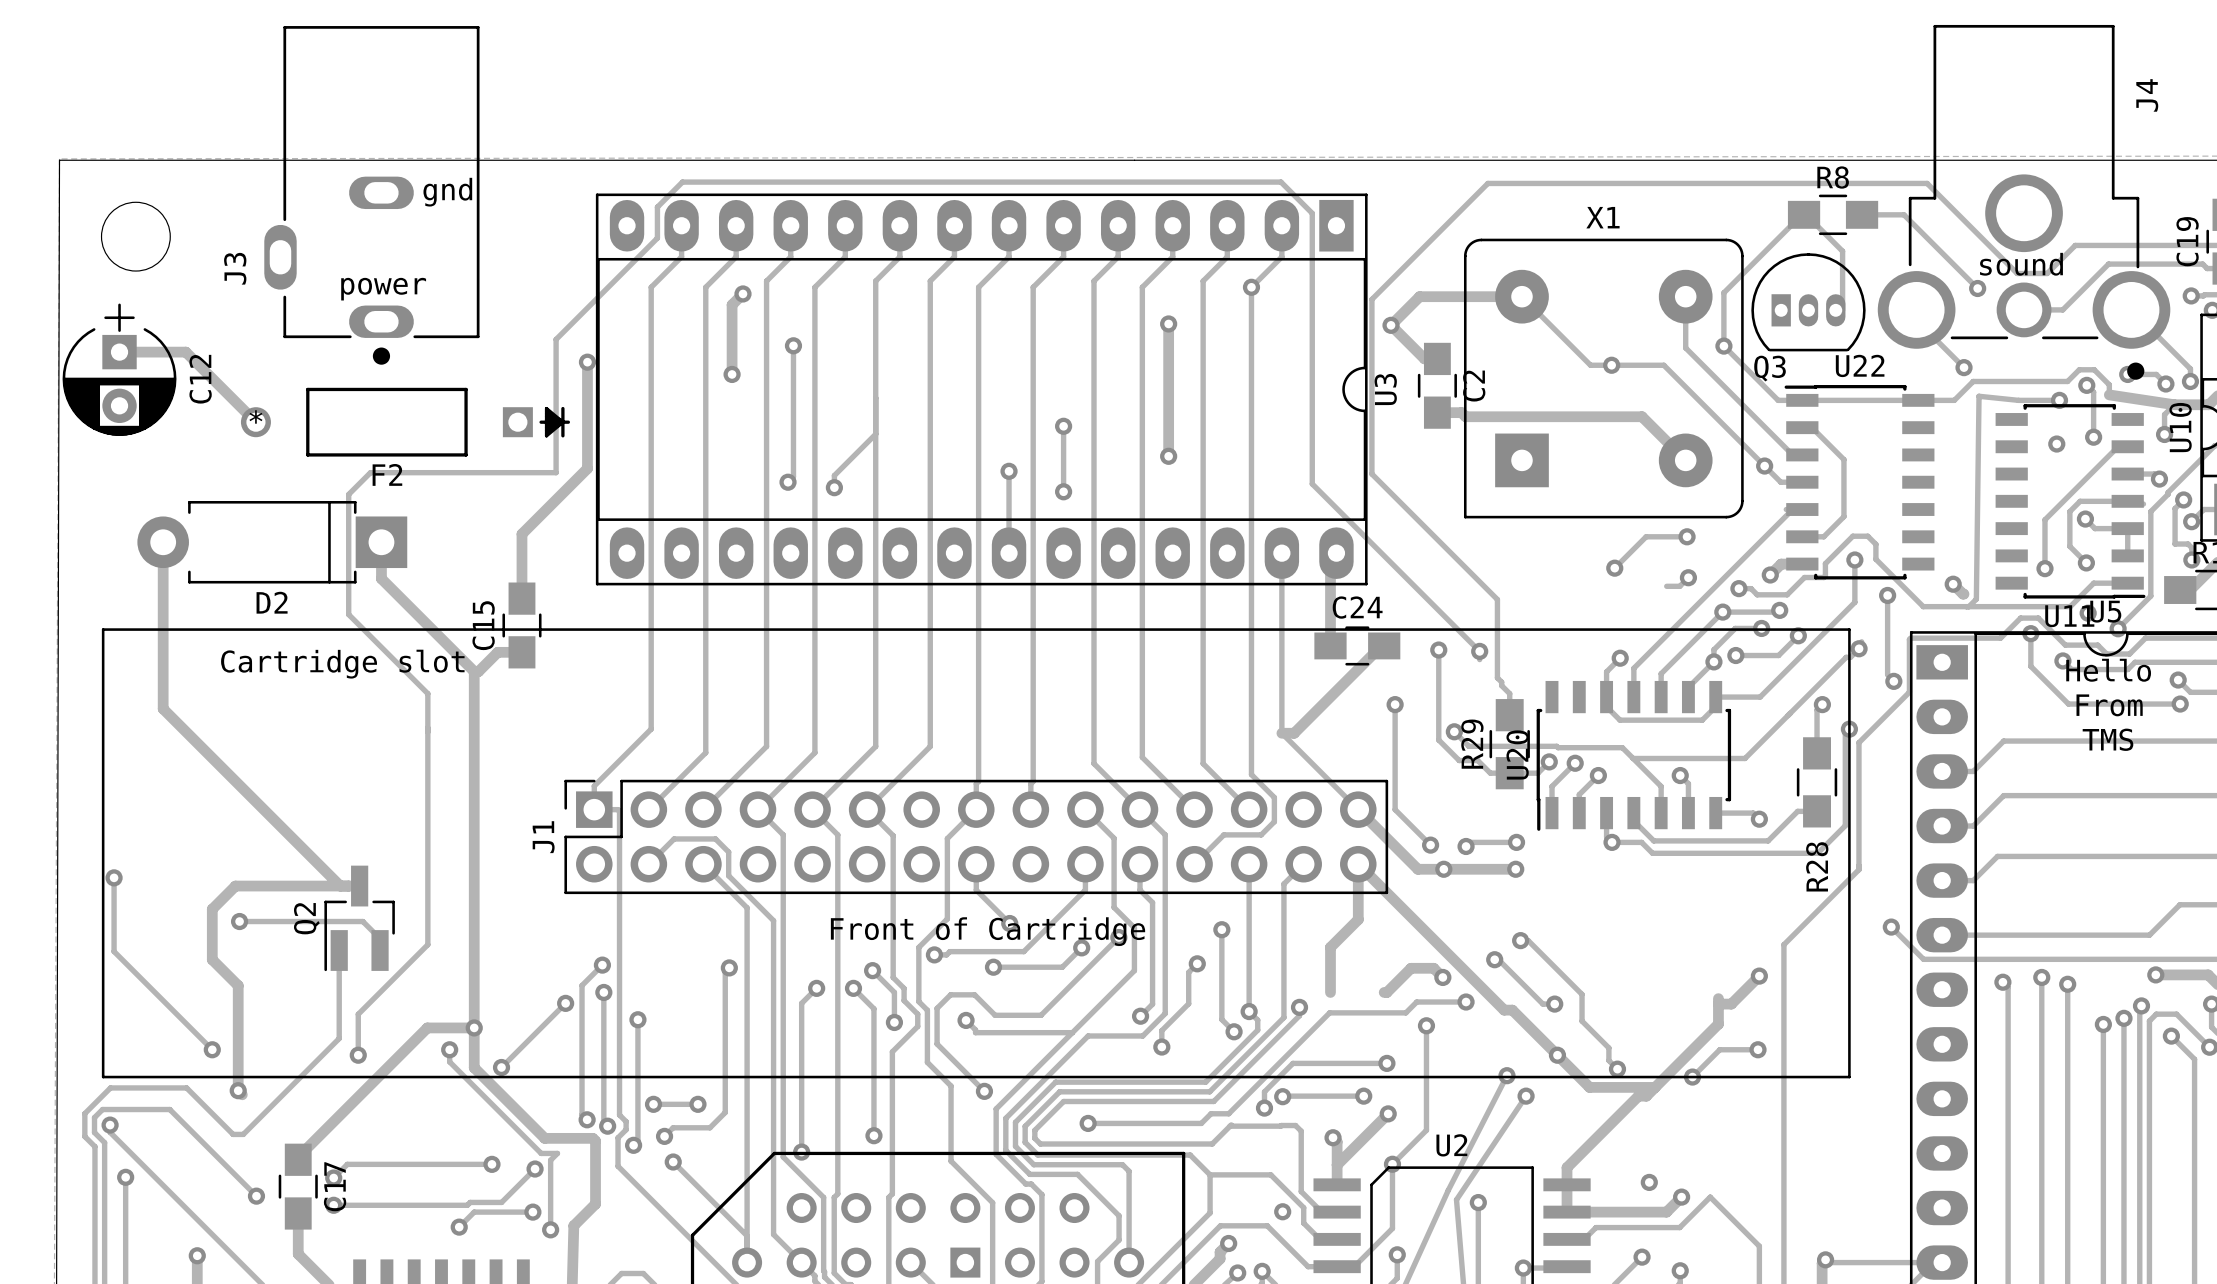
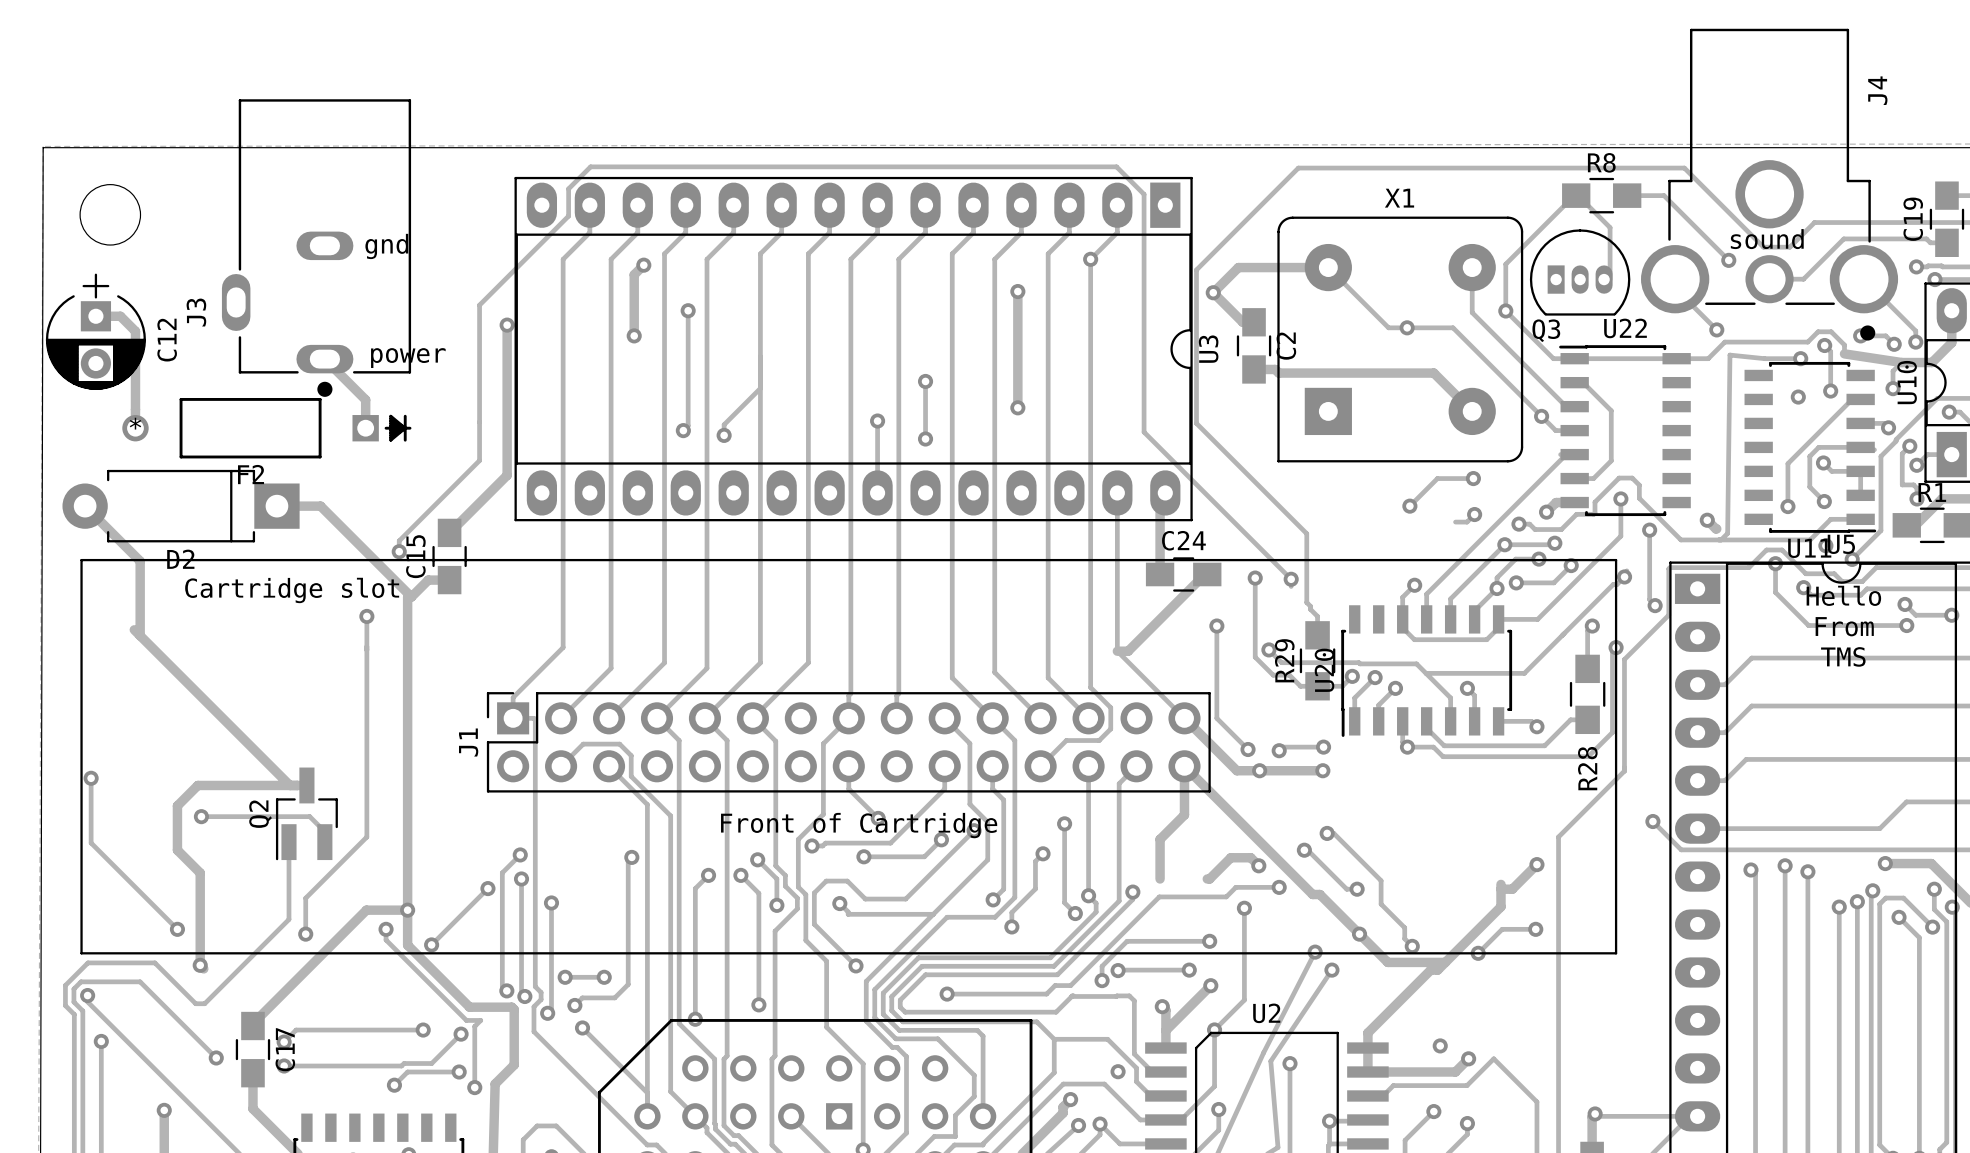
text position: gnd (447, 192) -> gnd (386, 246)
J3 position: (371, 195) -> (316, 248)
text position: power (383, 289) -> power (408, 358)
track: (147, 352) (185, 352) (255, 422) -> (120, 316) (135, 331) (135, 428)
track: none -> (324, 359) (365, 399) (365, 428)
F2 position: (405, 422) -> (266, 428)
track: (587, 468) (521, 534) (521, 598) -> (507, 418) (507, 475) (449, 532)
track: (556, 472) (370, 472) (348, 494) (348, 614) (427, 693) -> (479, 422) (479, 460) (399, 540) (399, 551)
track: (163, 542) (163, 708) -> none
D2 position: (272, 542) -> (181, 506)
track: (381, 542) (381, 578) (474, 671) -> none
track: none -> (85, 506) (140, 561) (140, 635)
track: none -> (276, 506) (320, 506) (411, 596)
via: none -> (399, 551)
via: none -> (366, 616)

